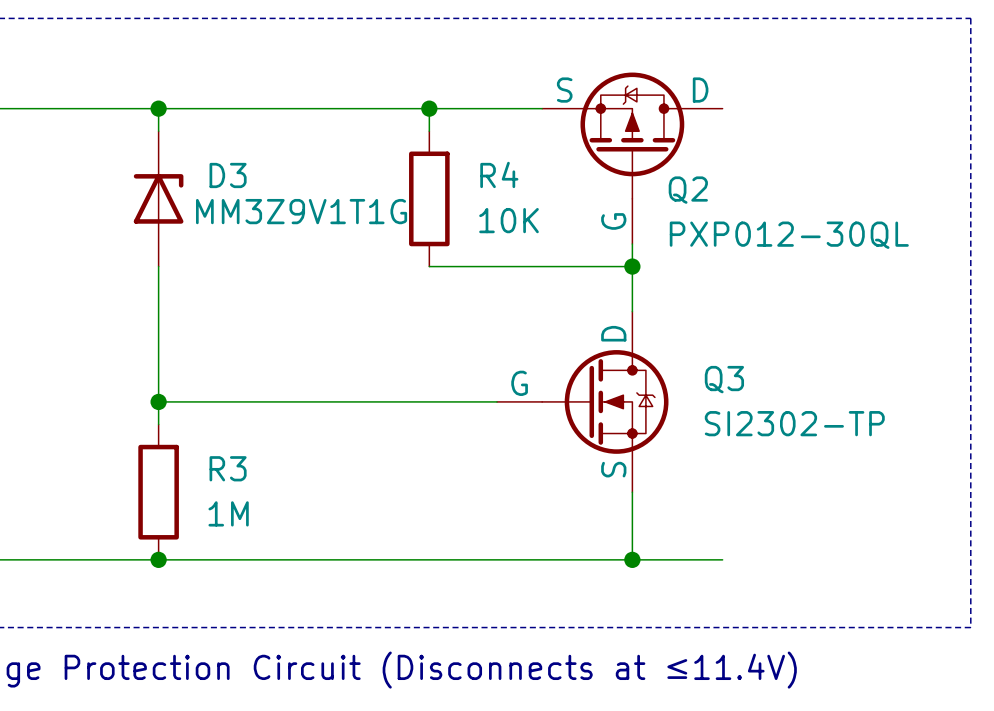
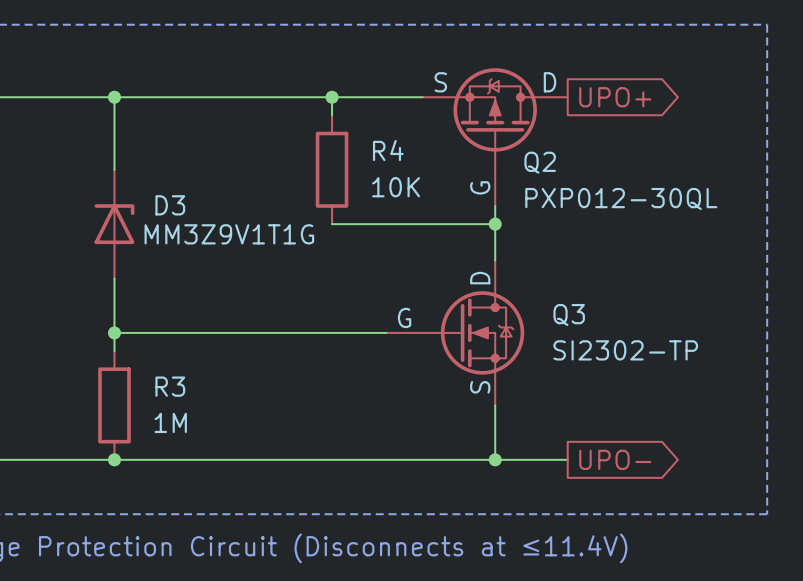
global label: none -> UPO+ (615, 97)
D3 position: (158, 198) -> (114, 224)
global label: none -> UPO- (615, 459)

